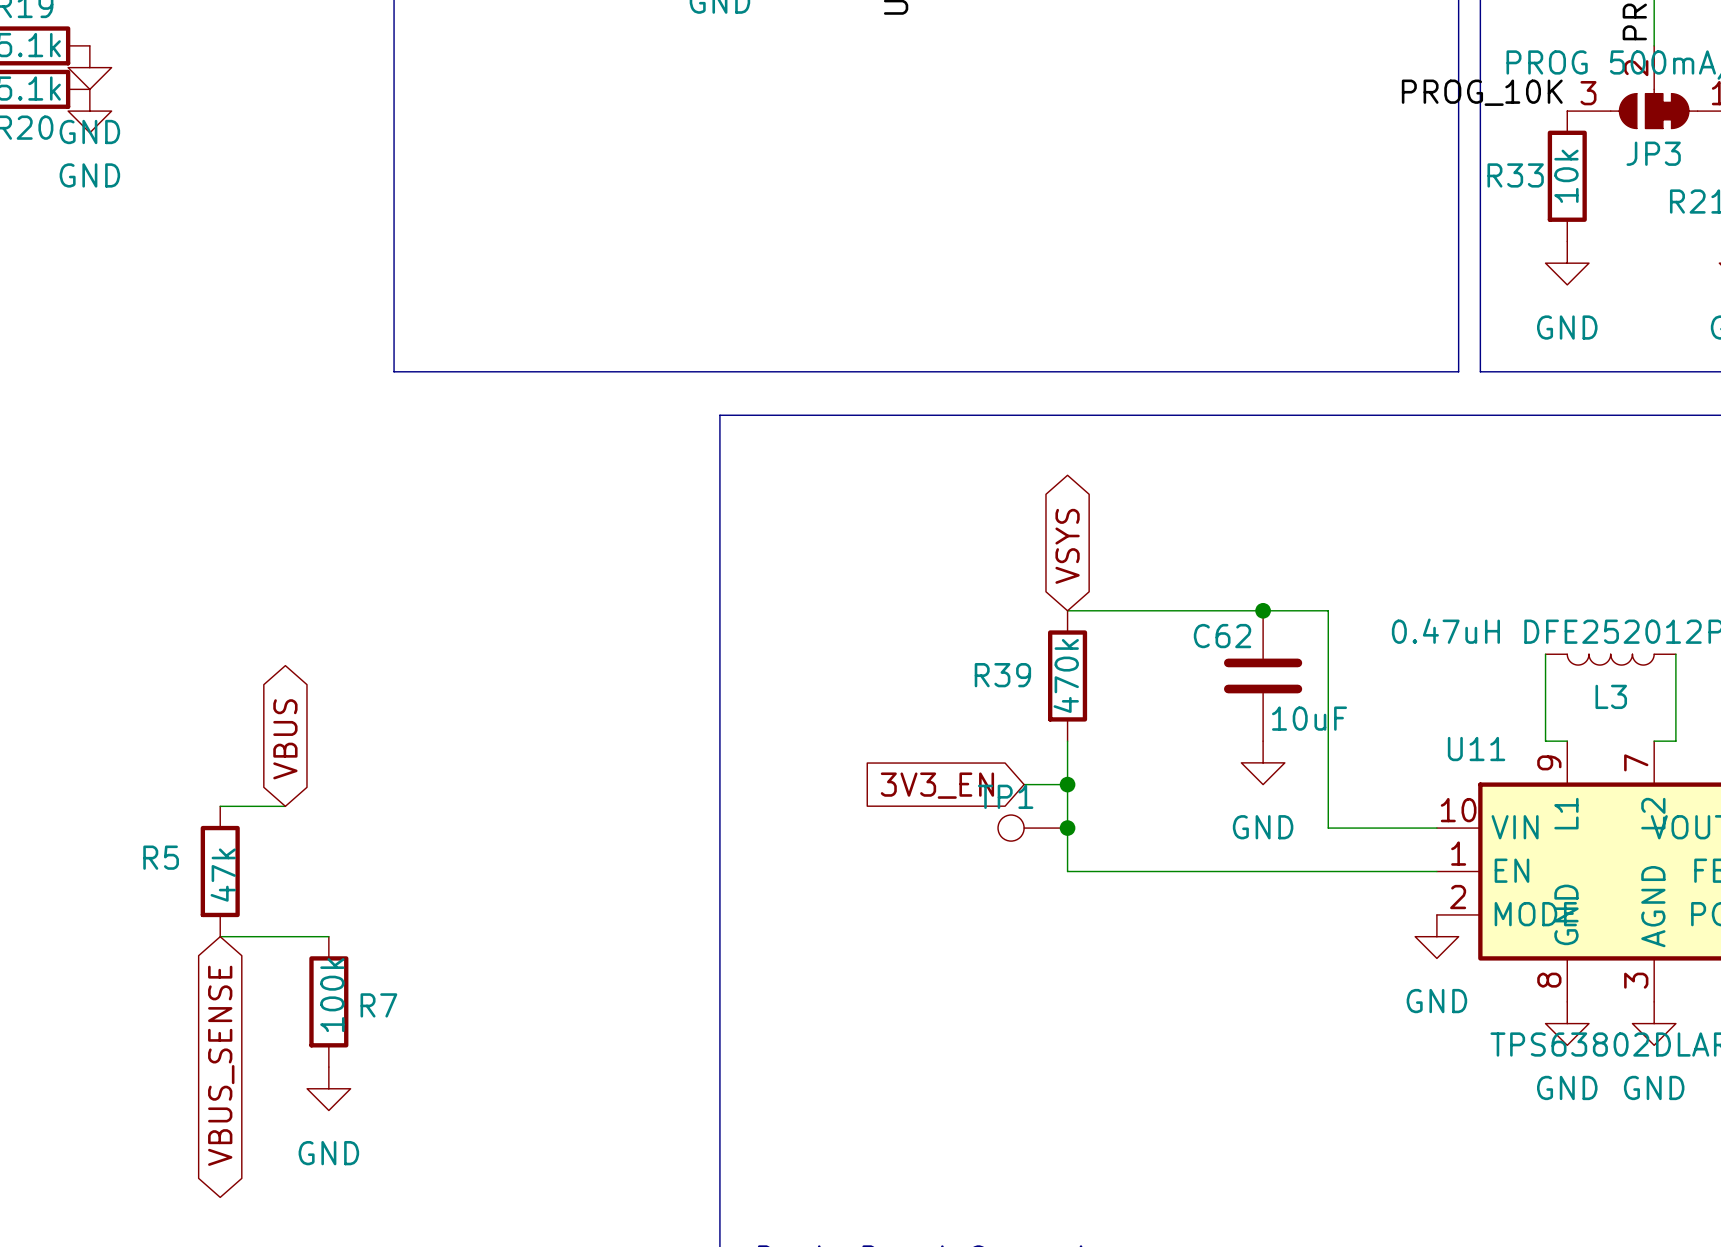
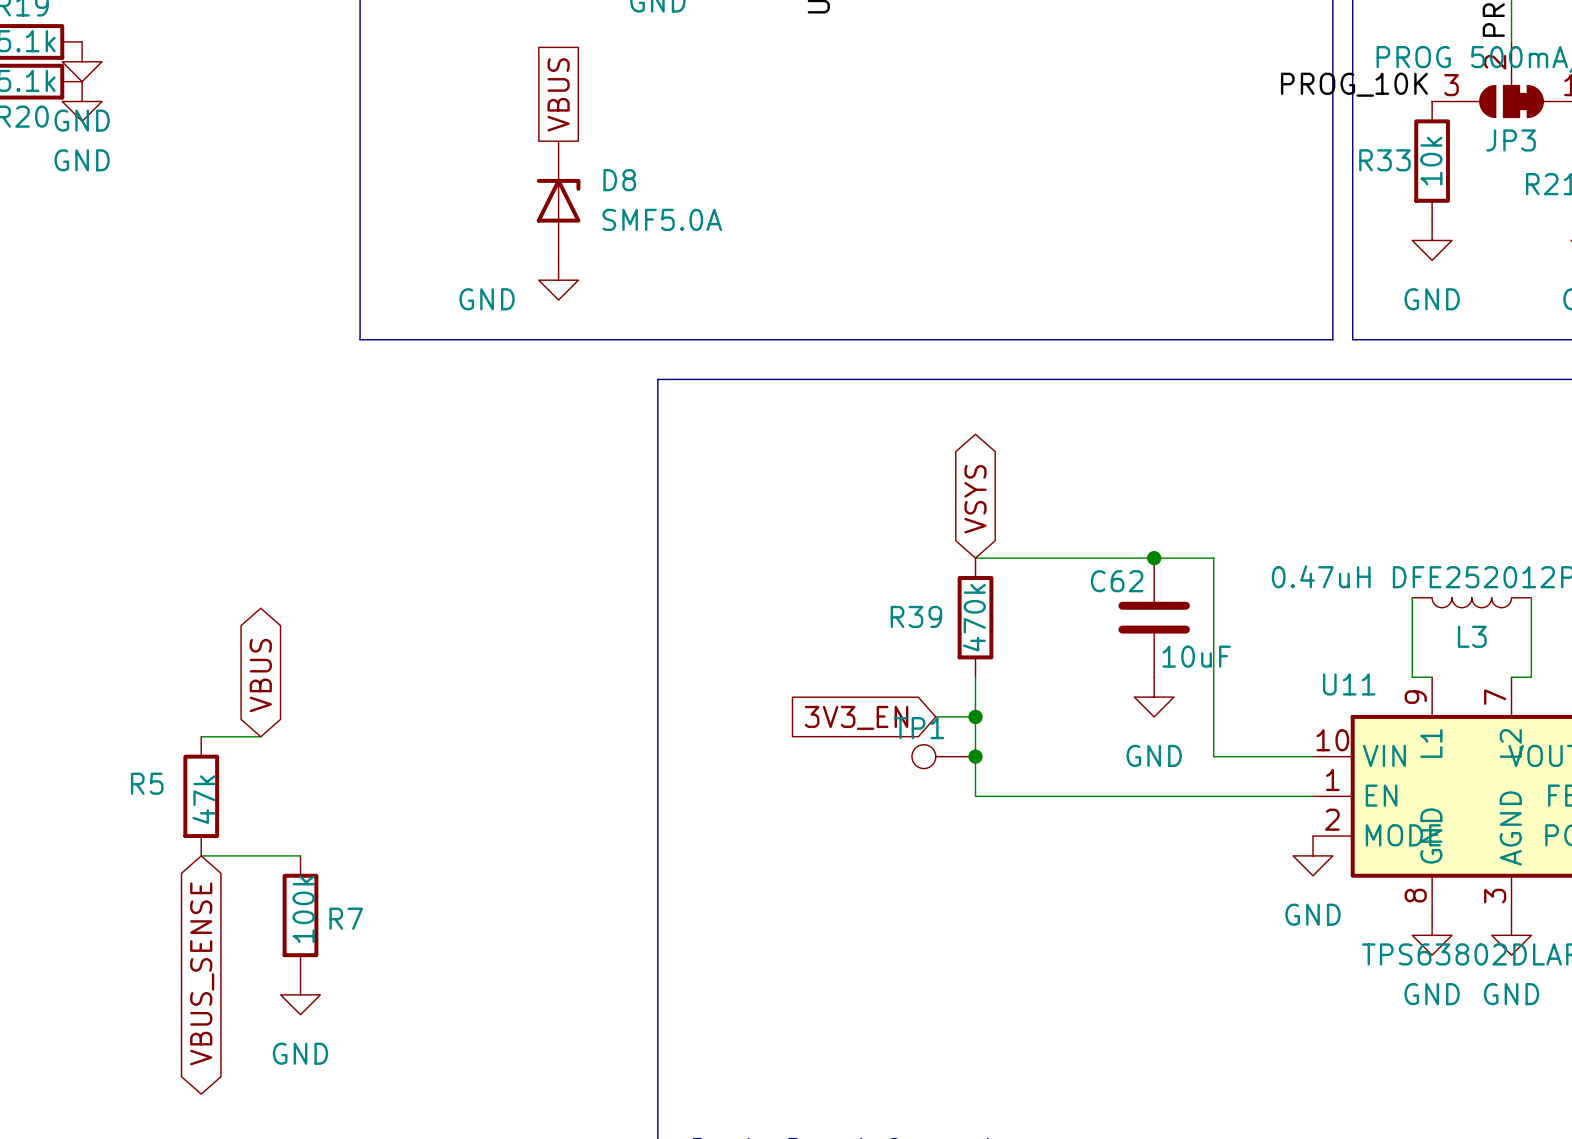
global label: none -> VBUS (558, 94)
D8: none -> SMF5.0A (558, 200)
power symbol: none -> GND (558, 280)

